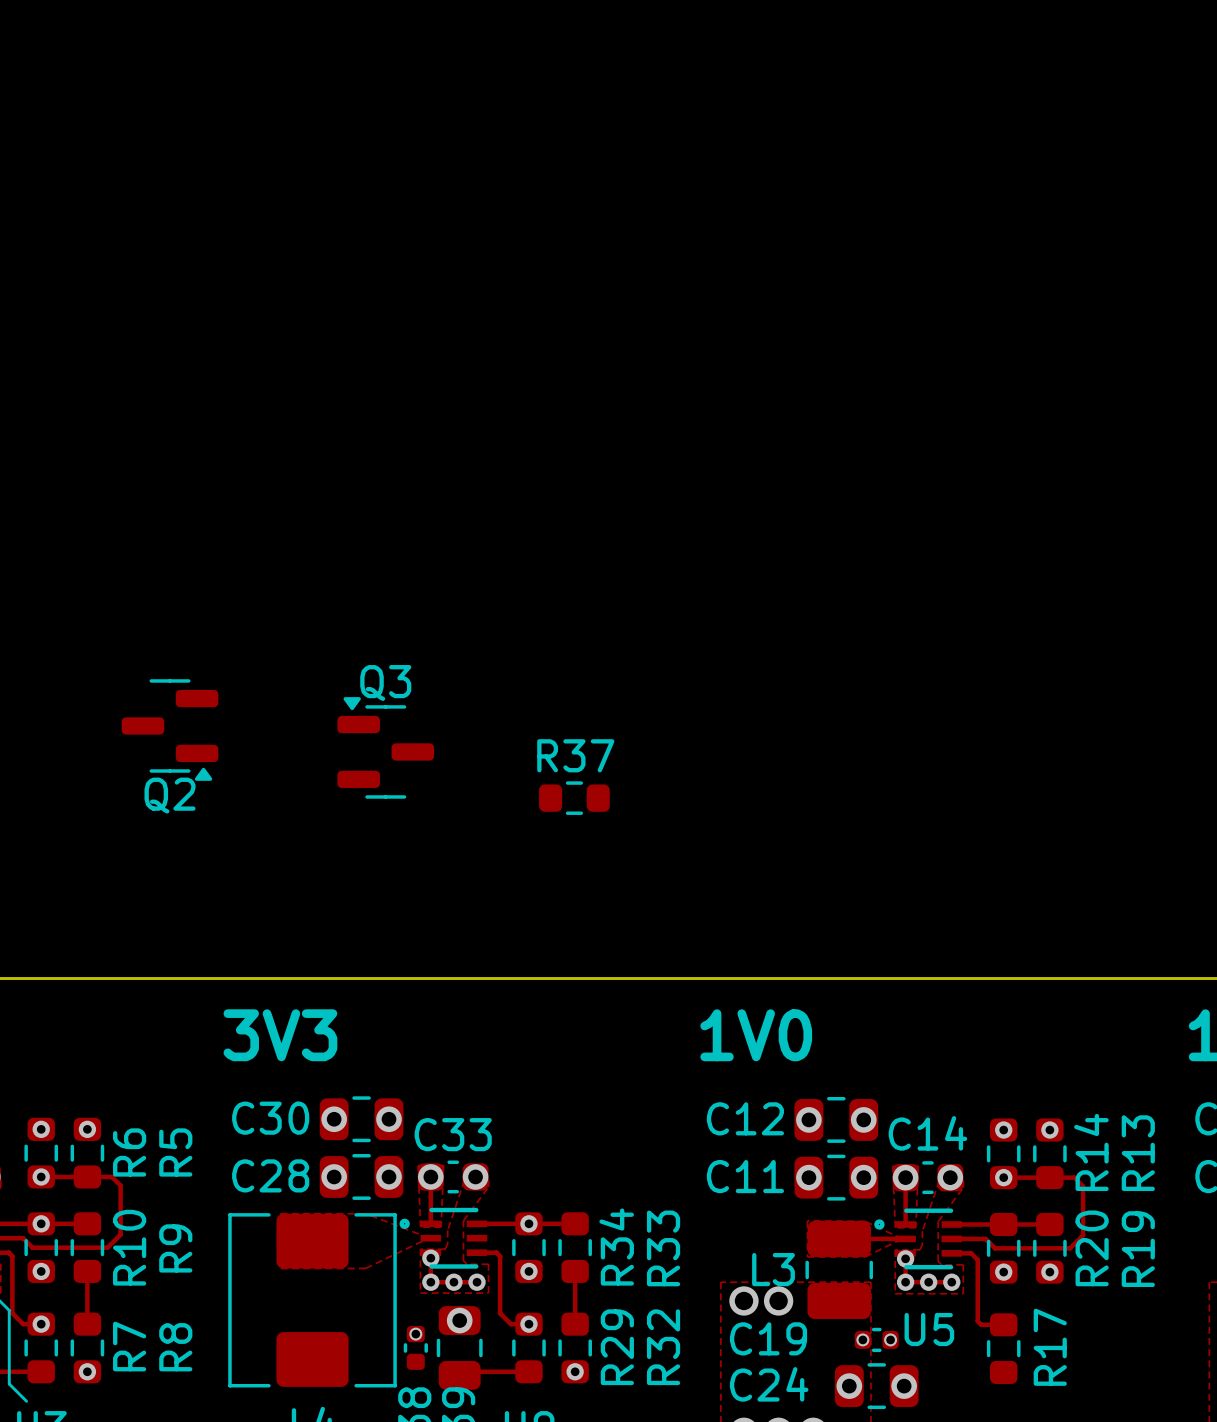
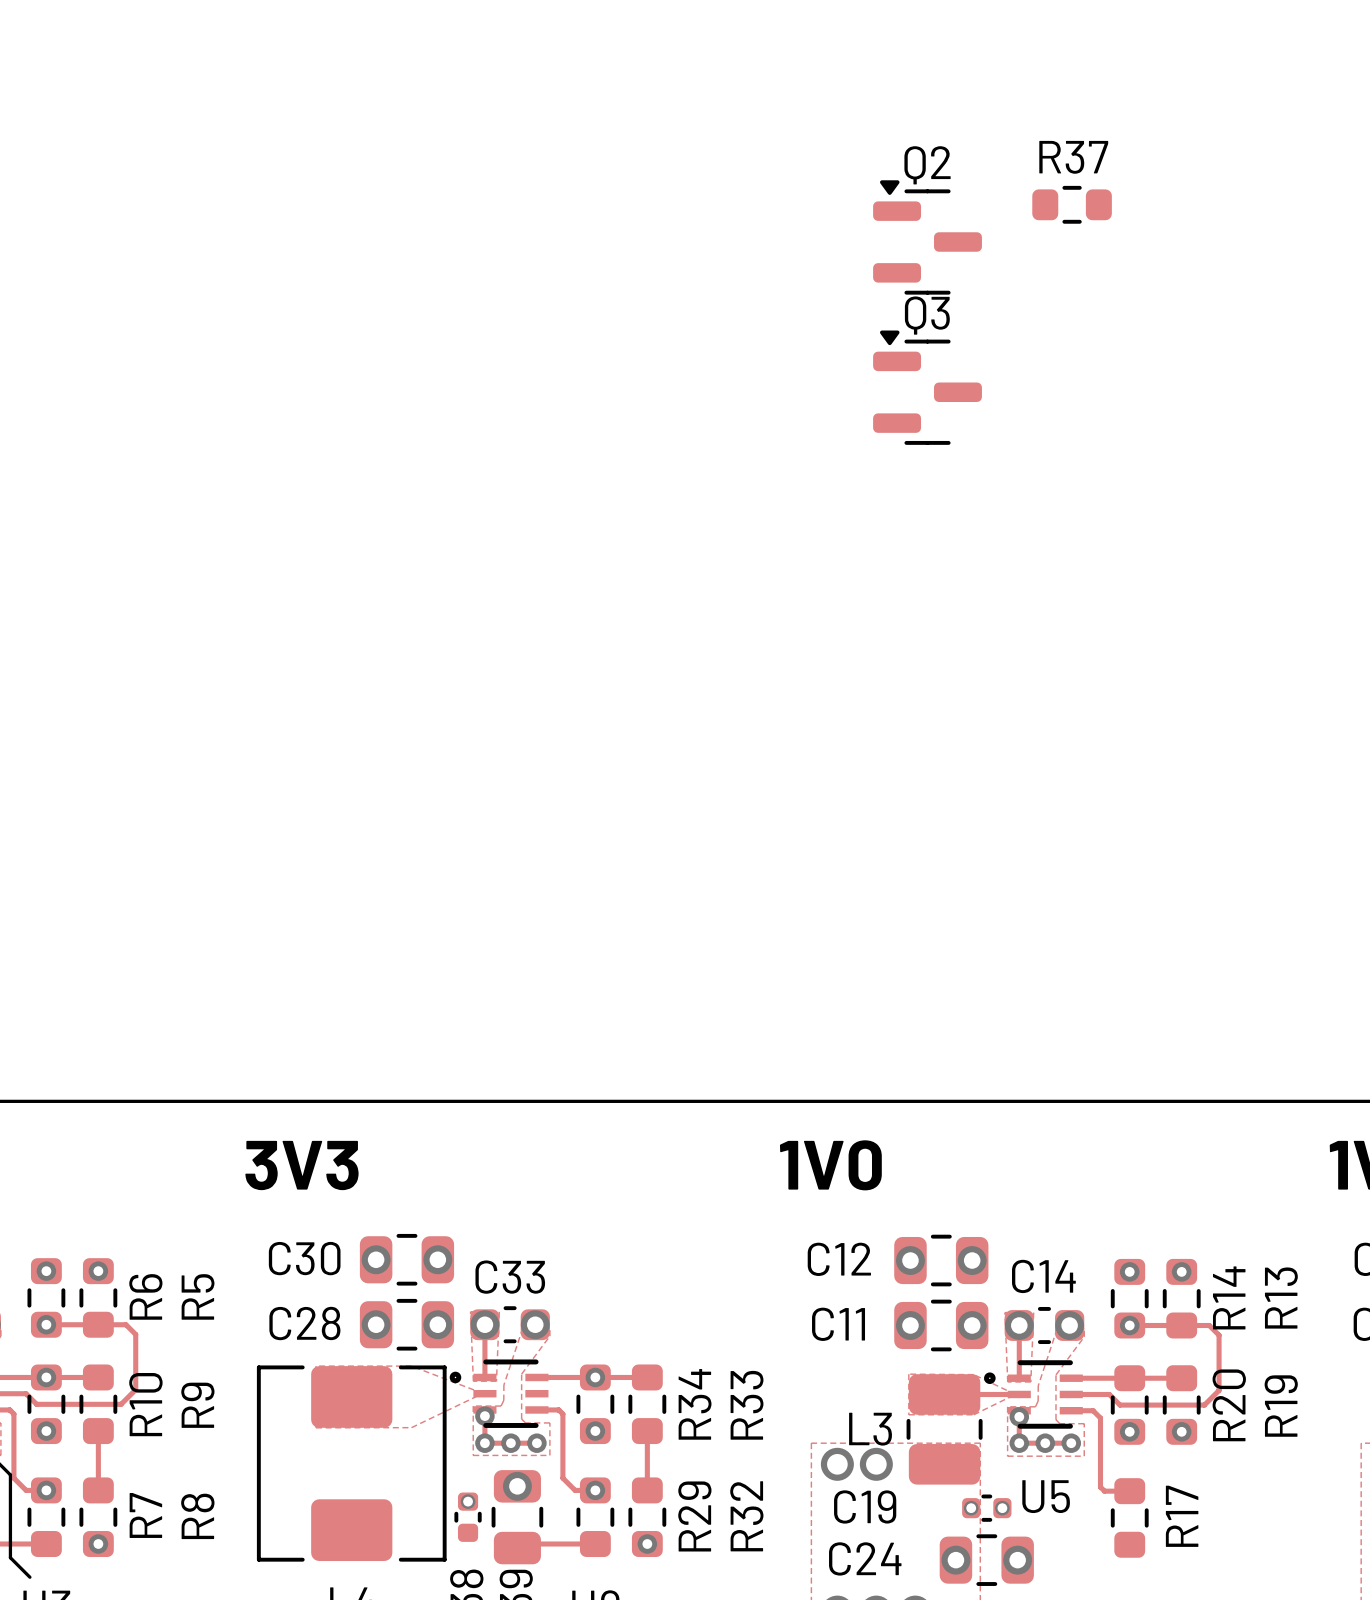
Q2 rotation: 0° (170, 730) -> 180° (927, 237)
Q2 position: (170, 730) -> (927, 237)
Q3 position: (385, 747) -> (927, 387)
R37 position: (574, 798) -> (1072, 204)

